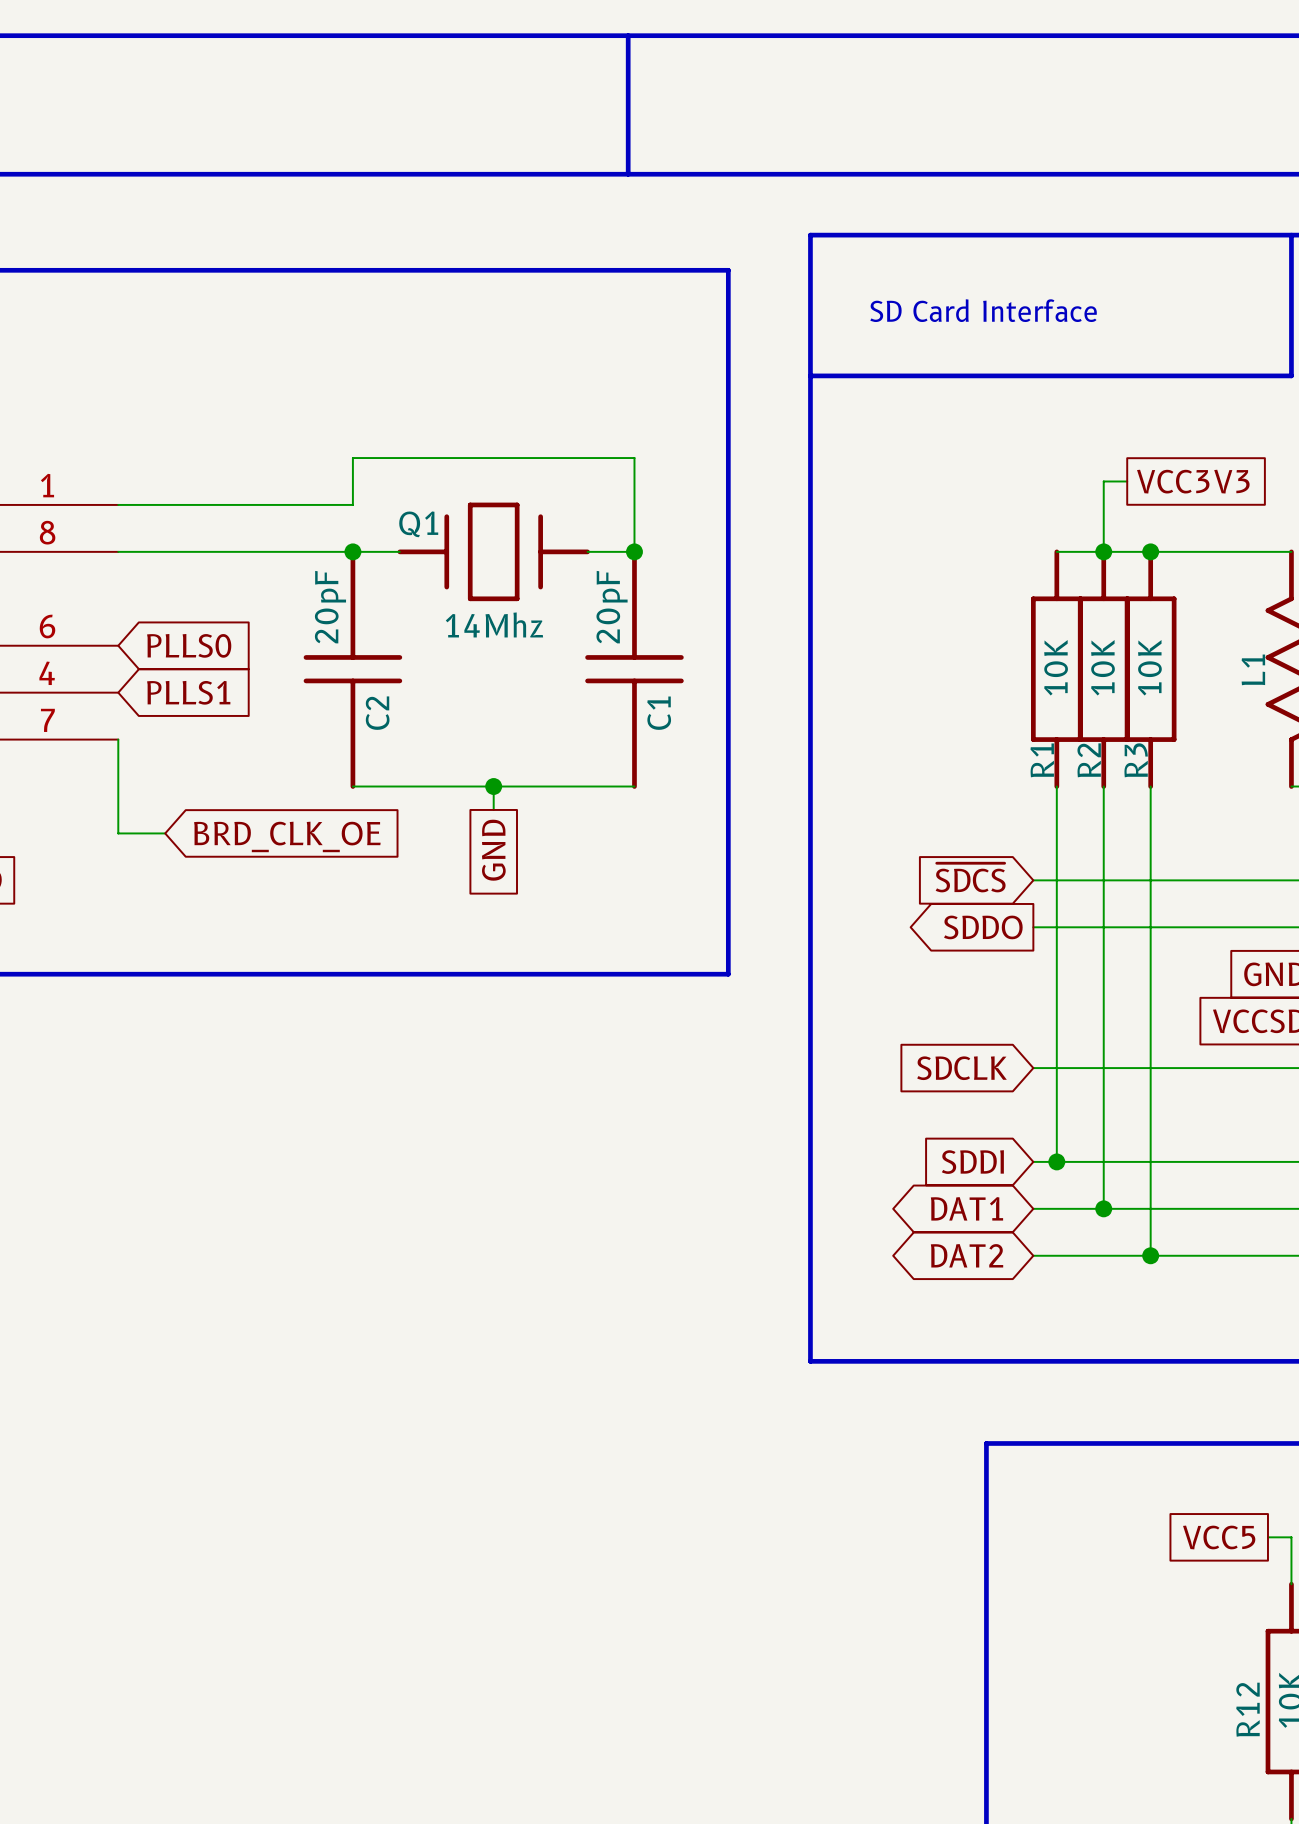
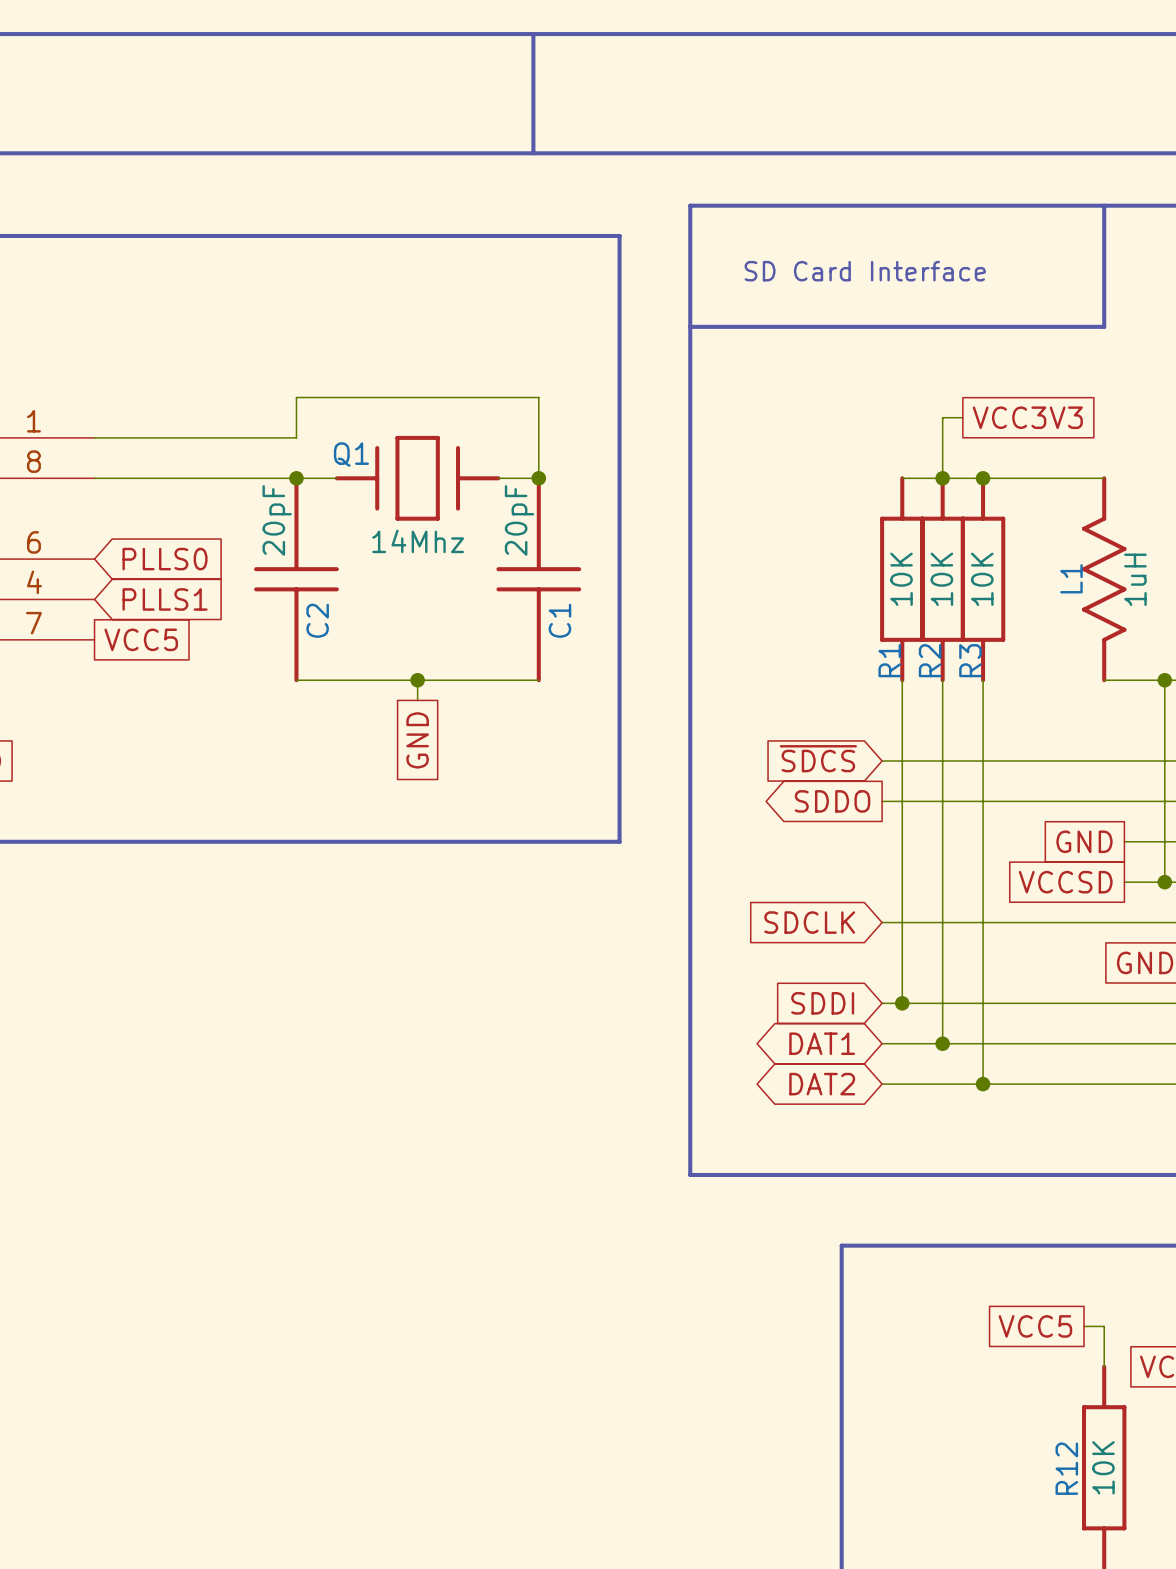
wire: (118, 739) (118, 833) (165, 833) -> none
global label: none -> VCC5 (141, 639)
global label: BRD_CLK_OE (287, 836) -> none

